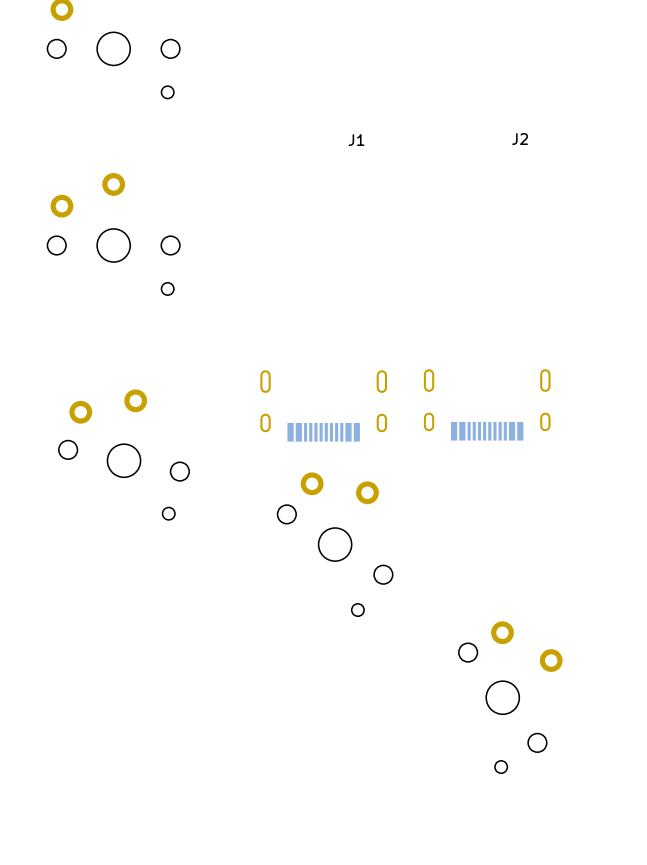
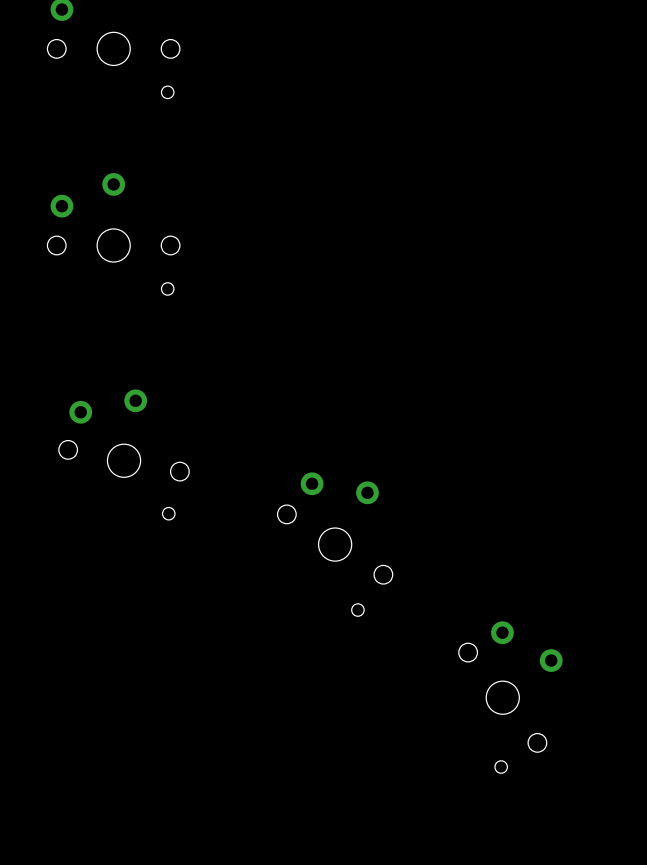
J2: (487, 404) -> none
J1: (323, 405) -> none

